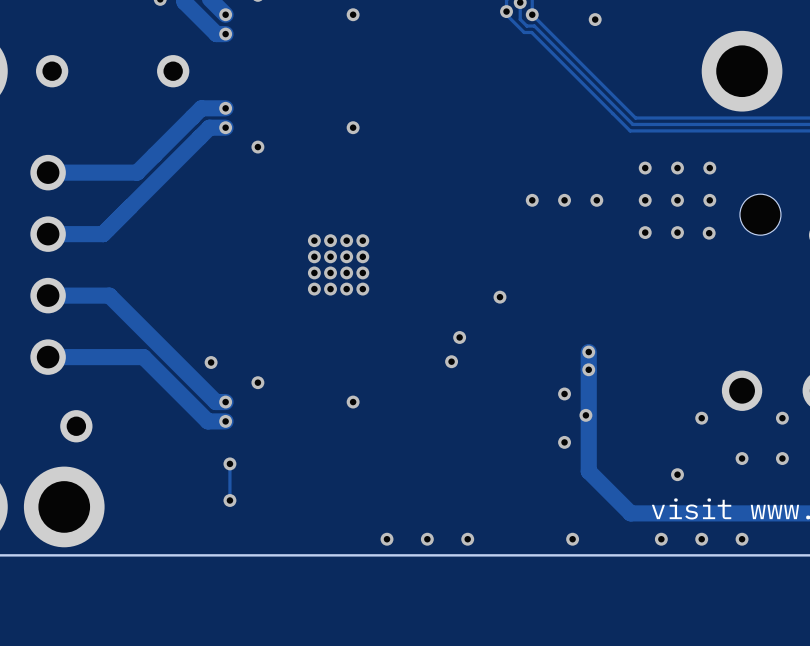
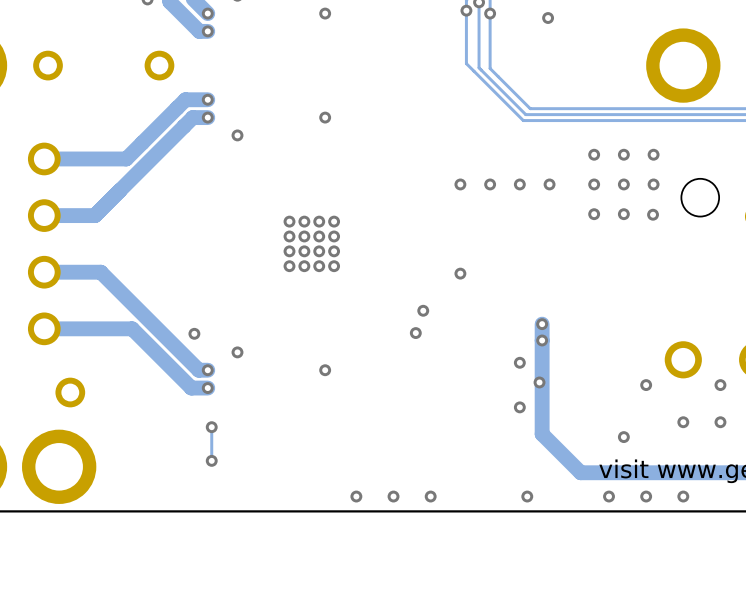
track: (506, 11) (506, 14) (524, 32) (531, 32) (630, 130) -> (466, 10) (466, 63) (523, 120) (580, 120)
track: (532, 14) (635, 118) -> (490, 13) (490, 68) (530, 108) (585, 108)
track: (520, 19) (526, 26) (534, 26) (632, 124) -> (479, 17) (479, 67) (525, 114) (582, 114)
via: none -> (460, 184)

